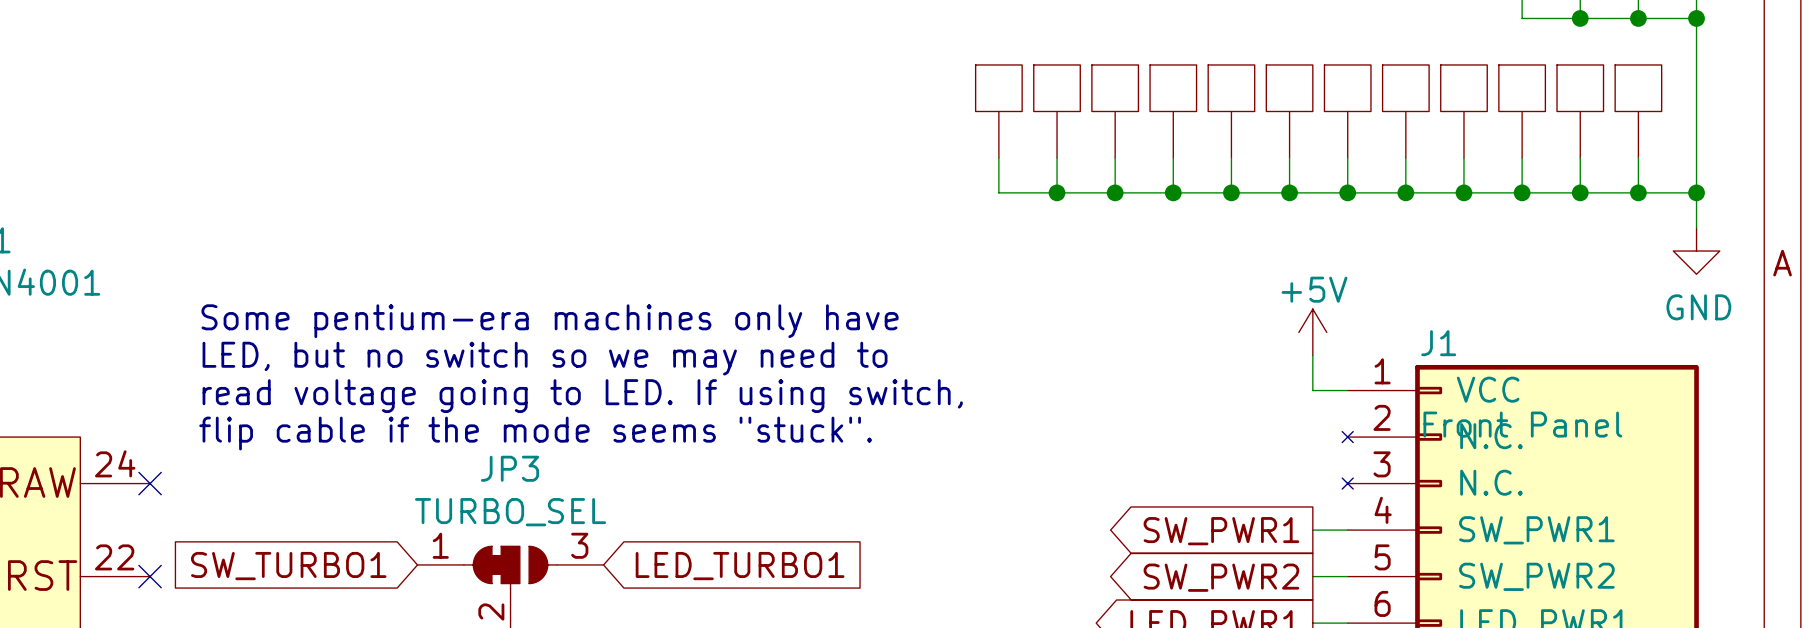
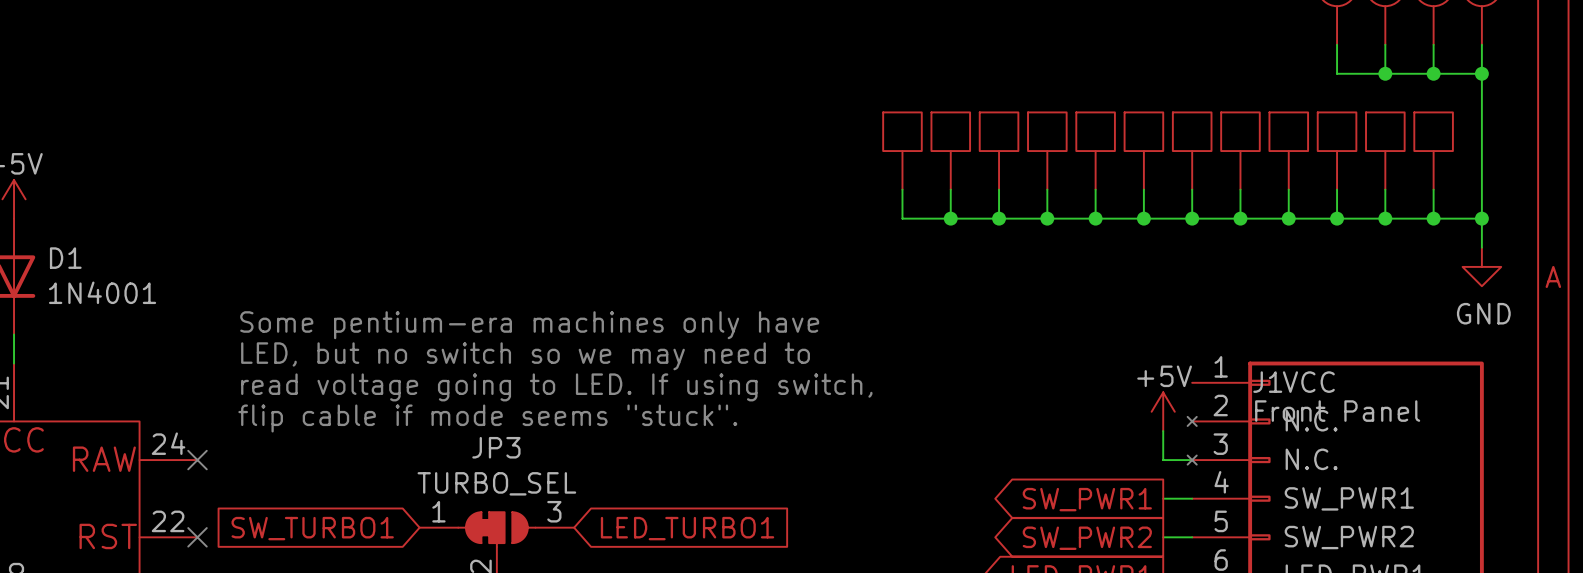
power symbol position: +5V (1312, 332) -> +5V (1163, 411)
J1 name position: J1 (1438, 343) -> J1 (1267, 382)
wire: (1312, 355) (1312, 390) (1347, 390) -> (1163, 431) (1163, 460) (1192, 460)
text: flip cable if the mode seems "stuck". (535, 433) -> flip cable if mode seems "stuck". (487, 418)

